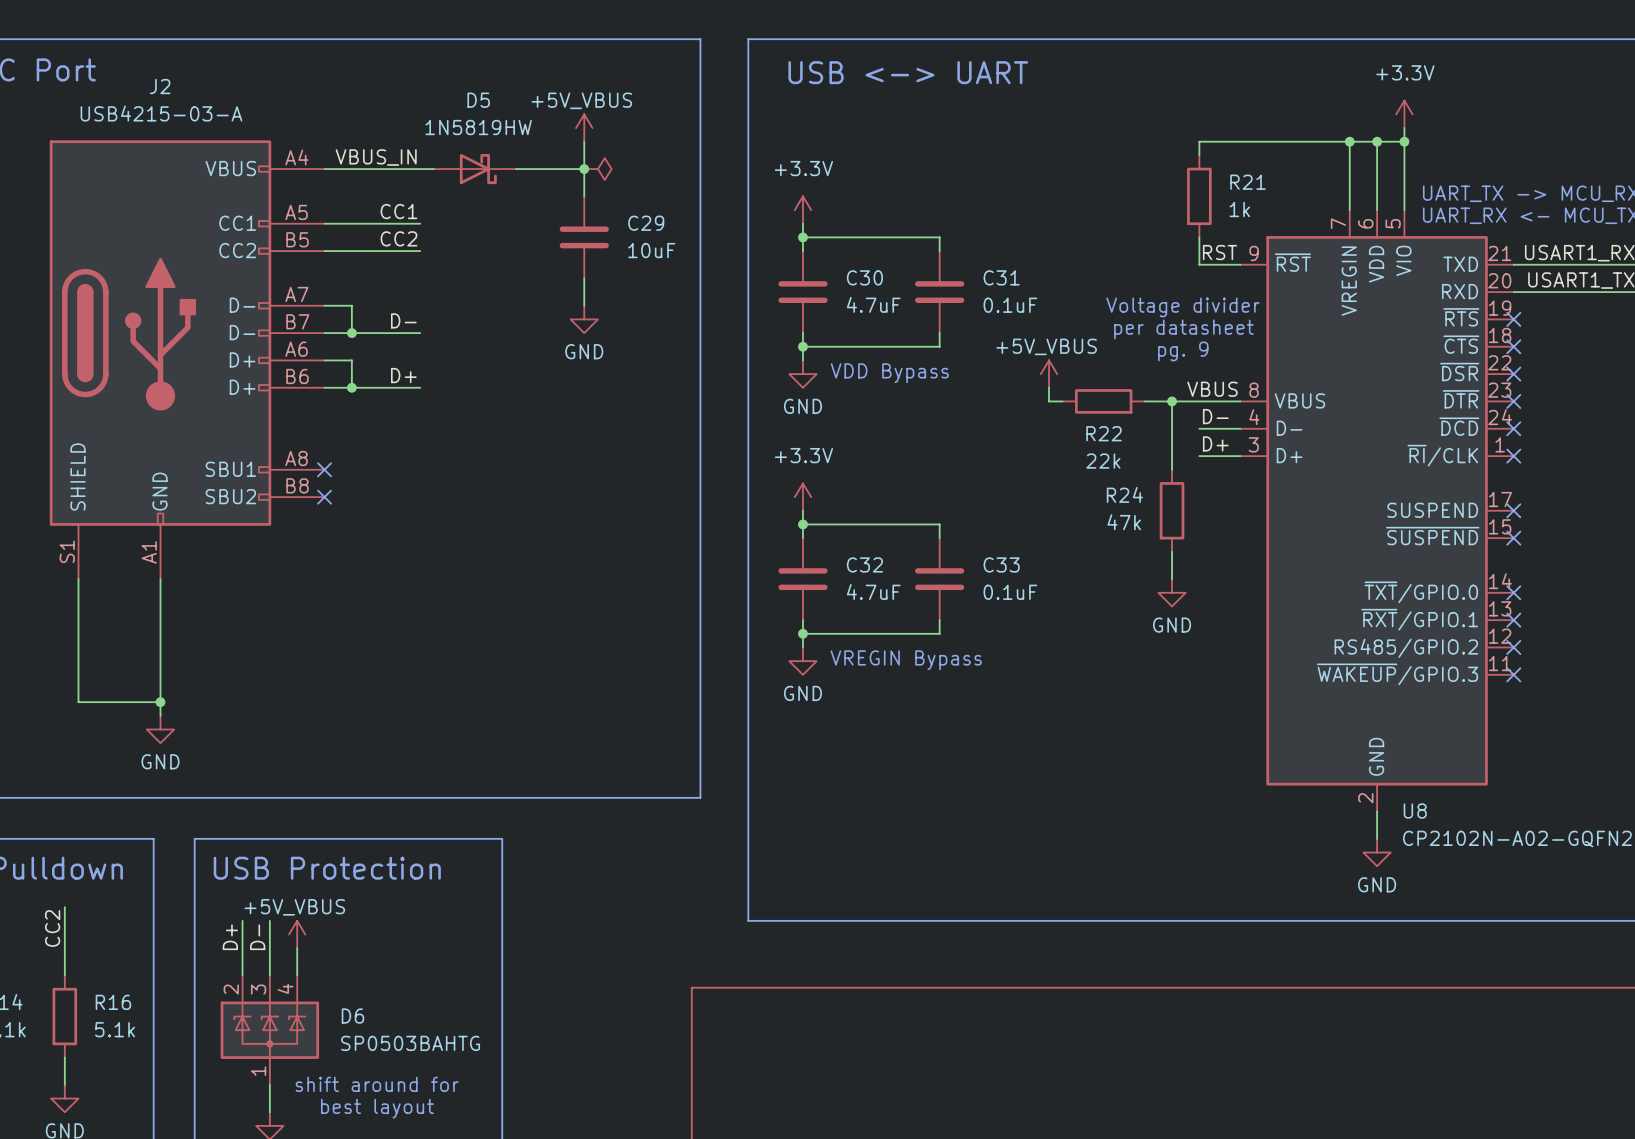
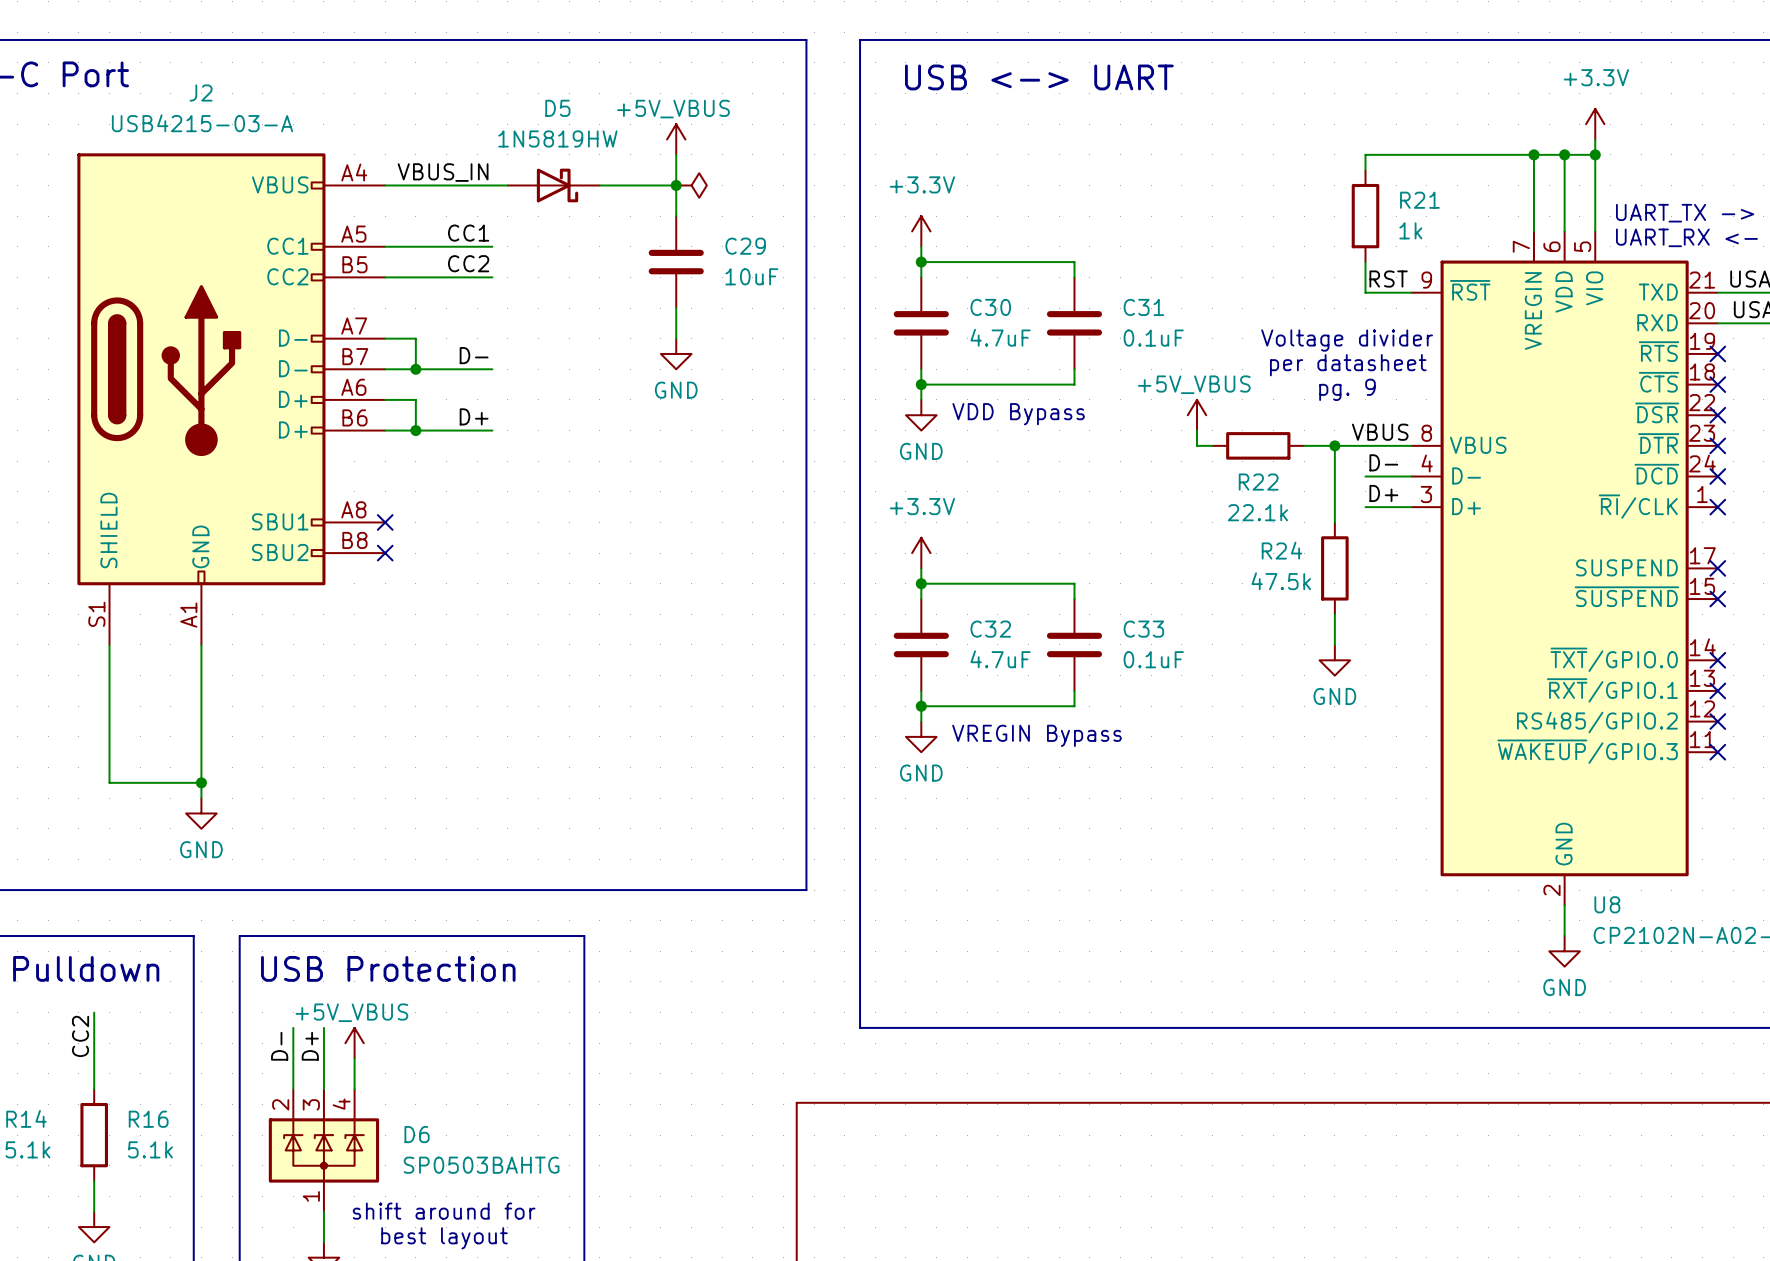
R22 value: 22k (1103, 461) -> 22.1k (1257, 512)
R24 value: 47k (1124, 522) -> 47.5k (1281, 581)
label: D+ (230, 937) -> D- (279, 1046)
label: D- (257, 937) -> D+ (310, 1046)

